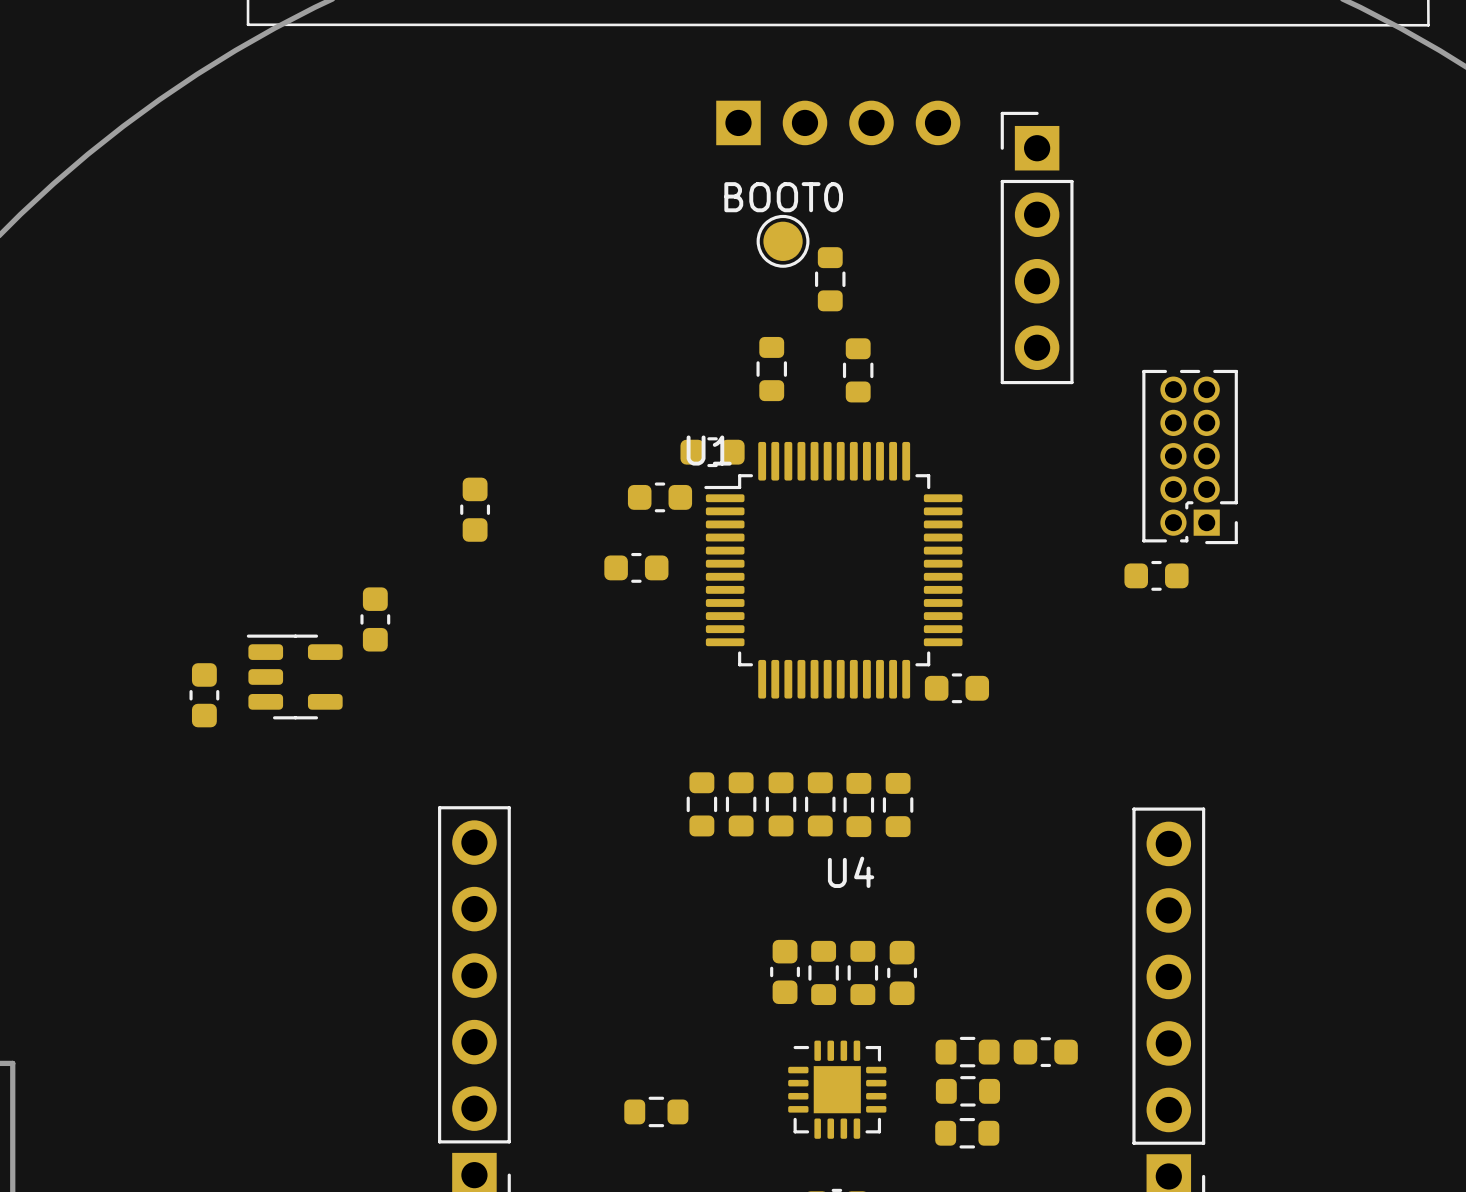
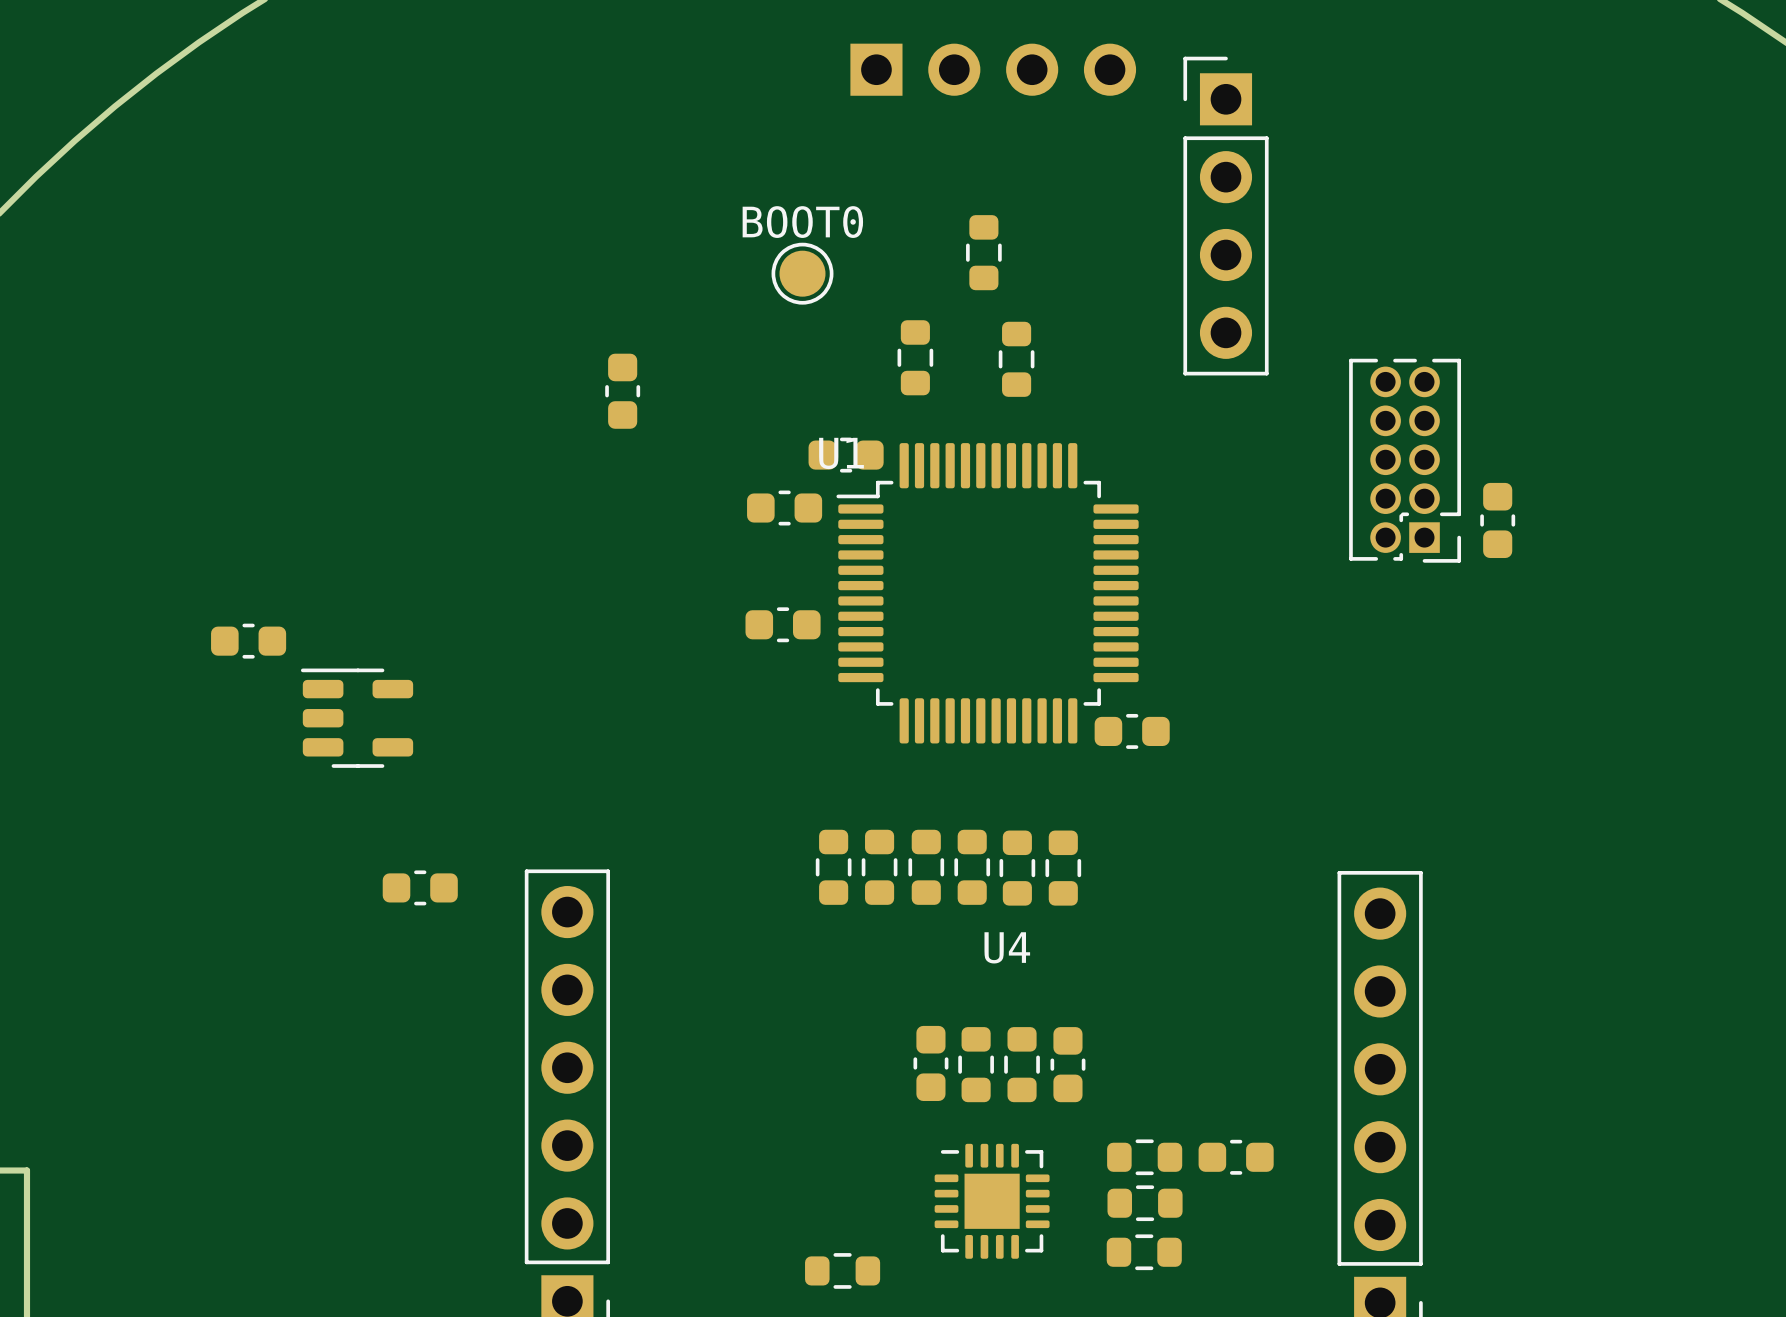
BOOT0 position: (783, 241) -> (802, 273)
part: none -> (622, 391)
part: (475, 509) -> none
part position: (636, 567) -> (783, 624)
part rotation: 0° (1156, 575) -> 90° clockwise (1497, 520)
part position: (1156, 575) -> (1497, 520)
part: (375, 619) -> none
part rotation: 0° (204, 695) -> 90° clockwise (248, 641)
part position: (204, 695) -> (248, 641)
part: none -> (420, 887)
part position: (656, 1111) -> (842, 1270)

